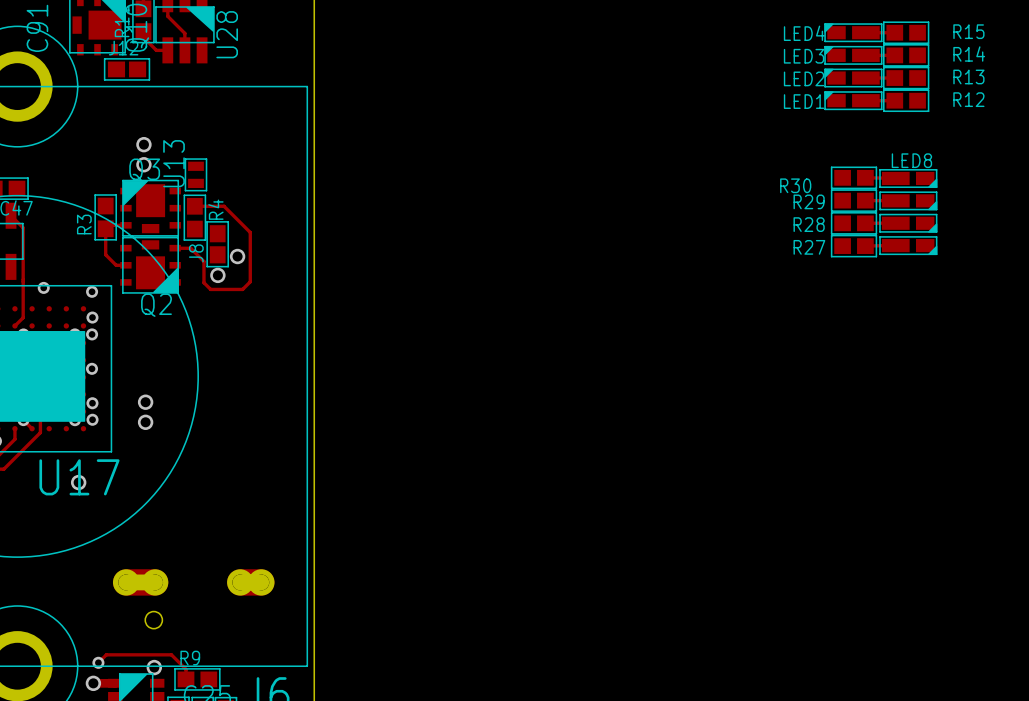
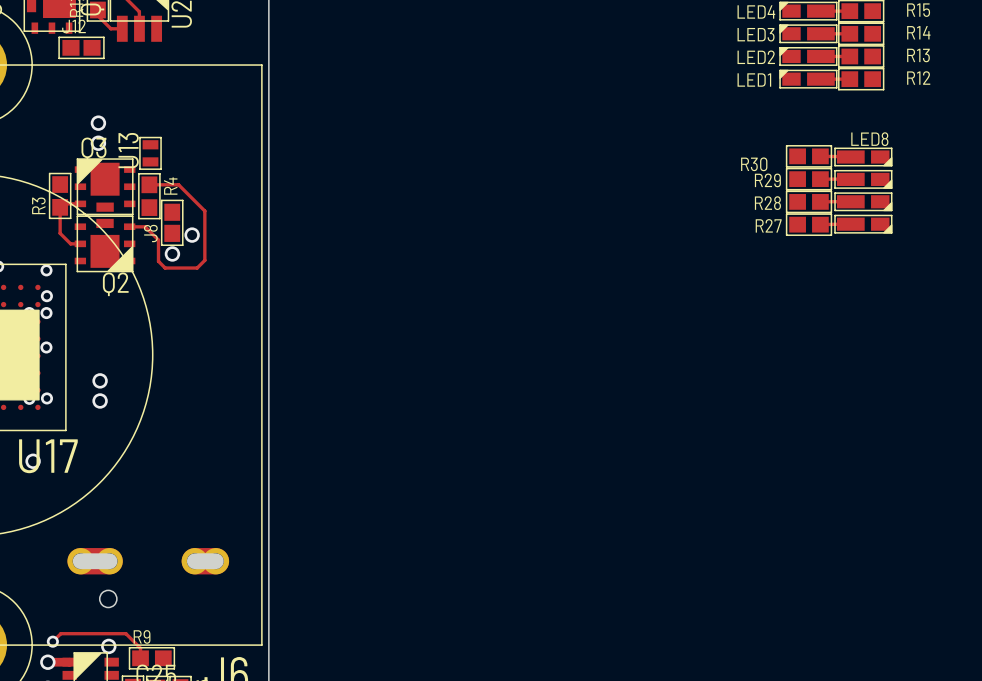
via: (92, 403) -> none

